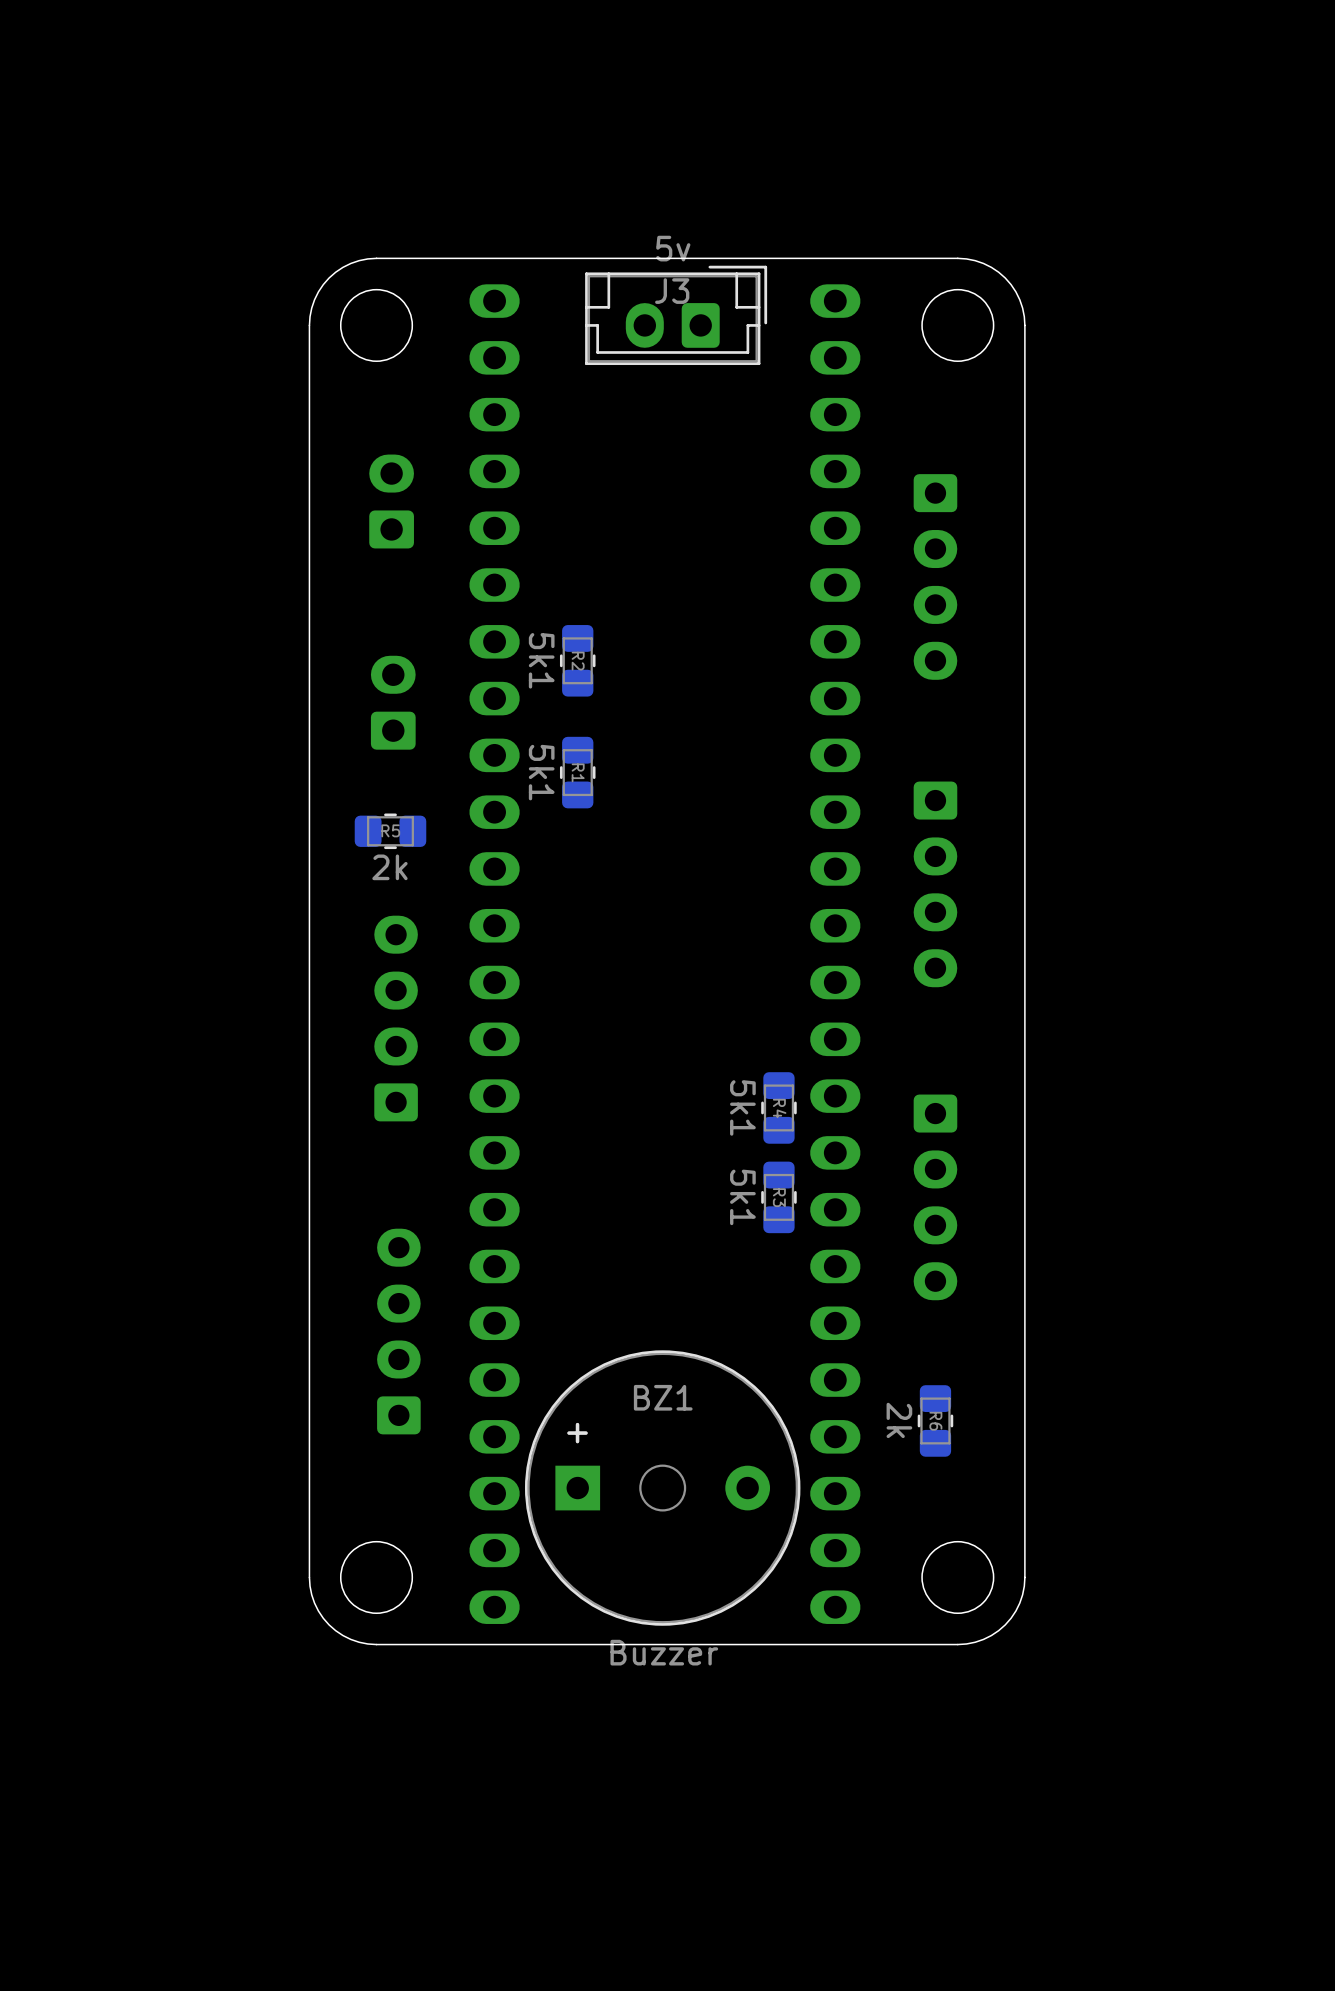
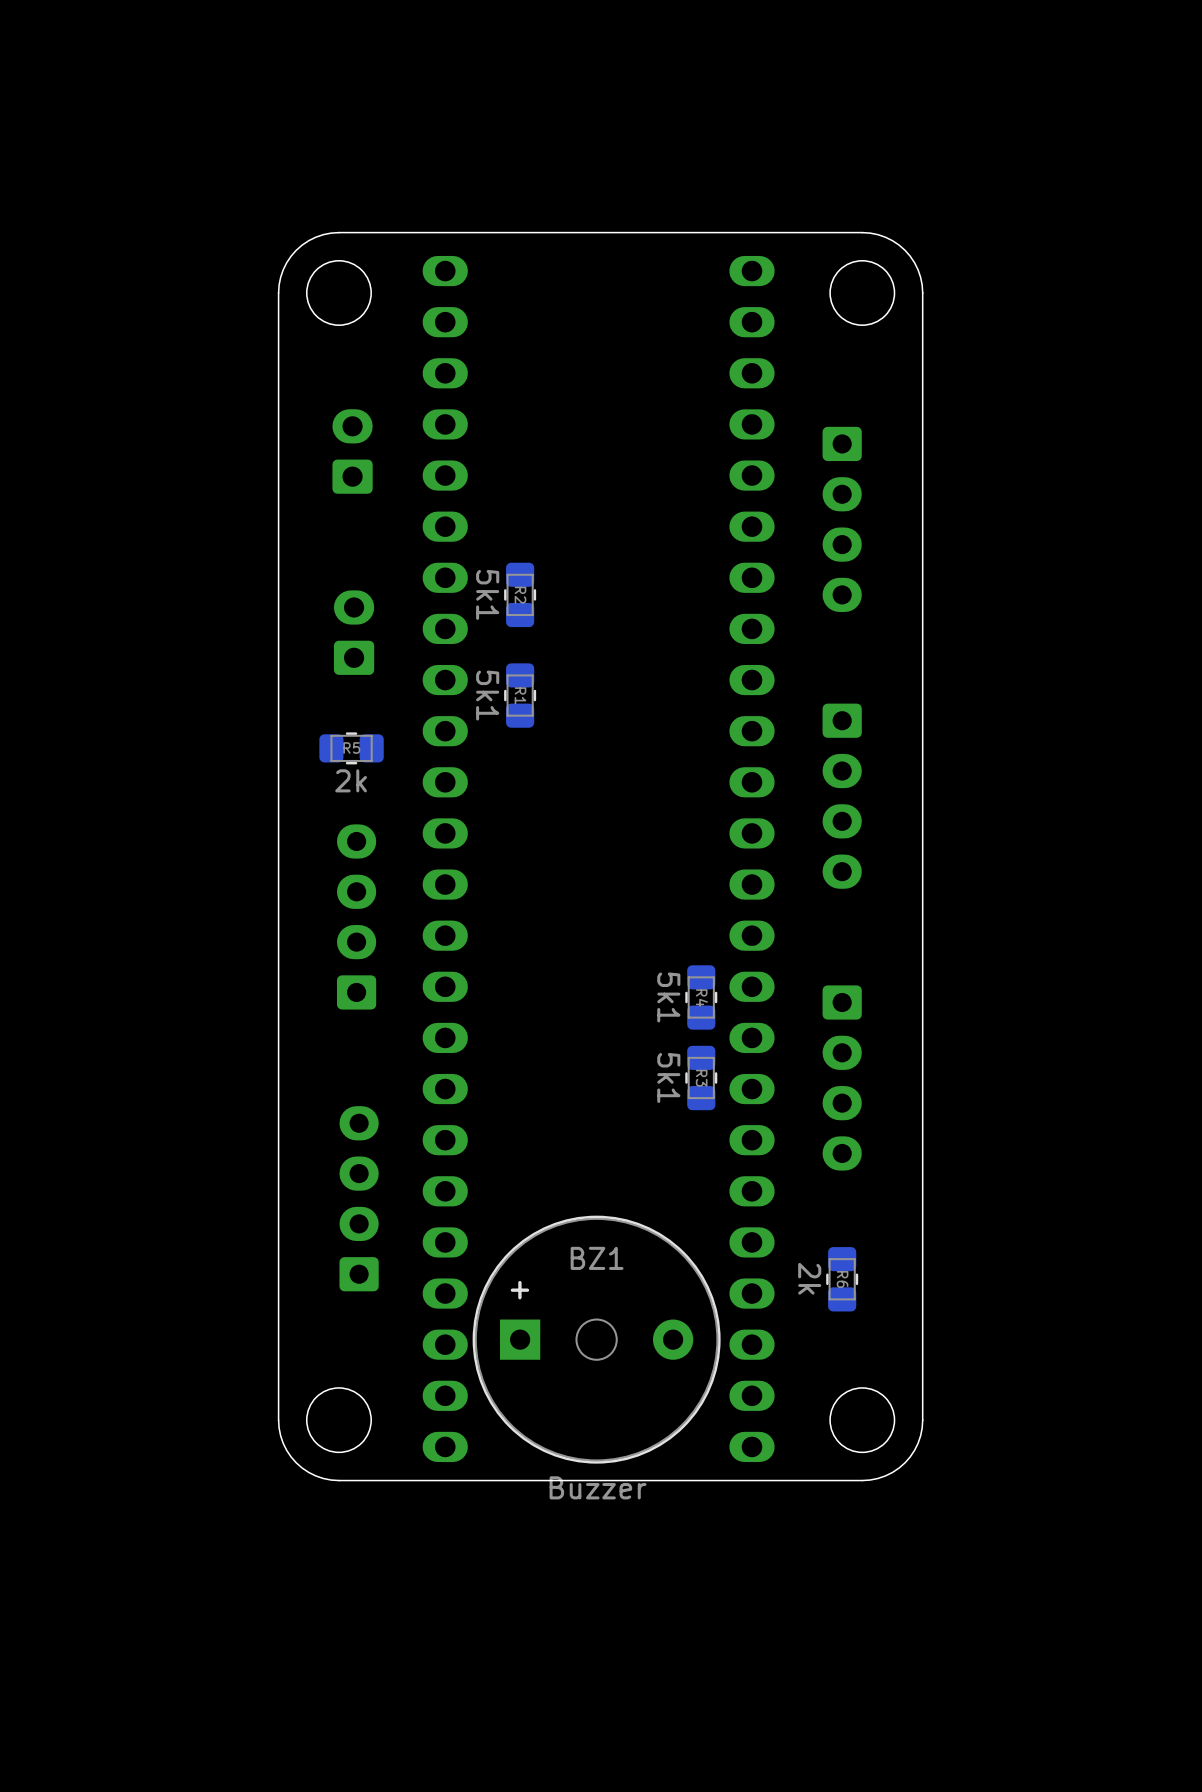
J3: 5v (676, 315) -> none

